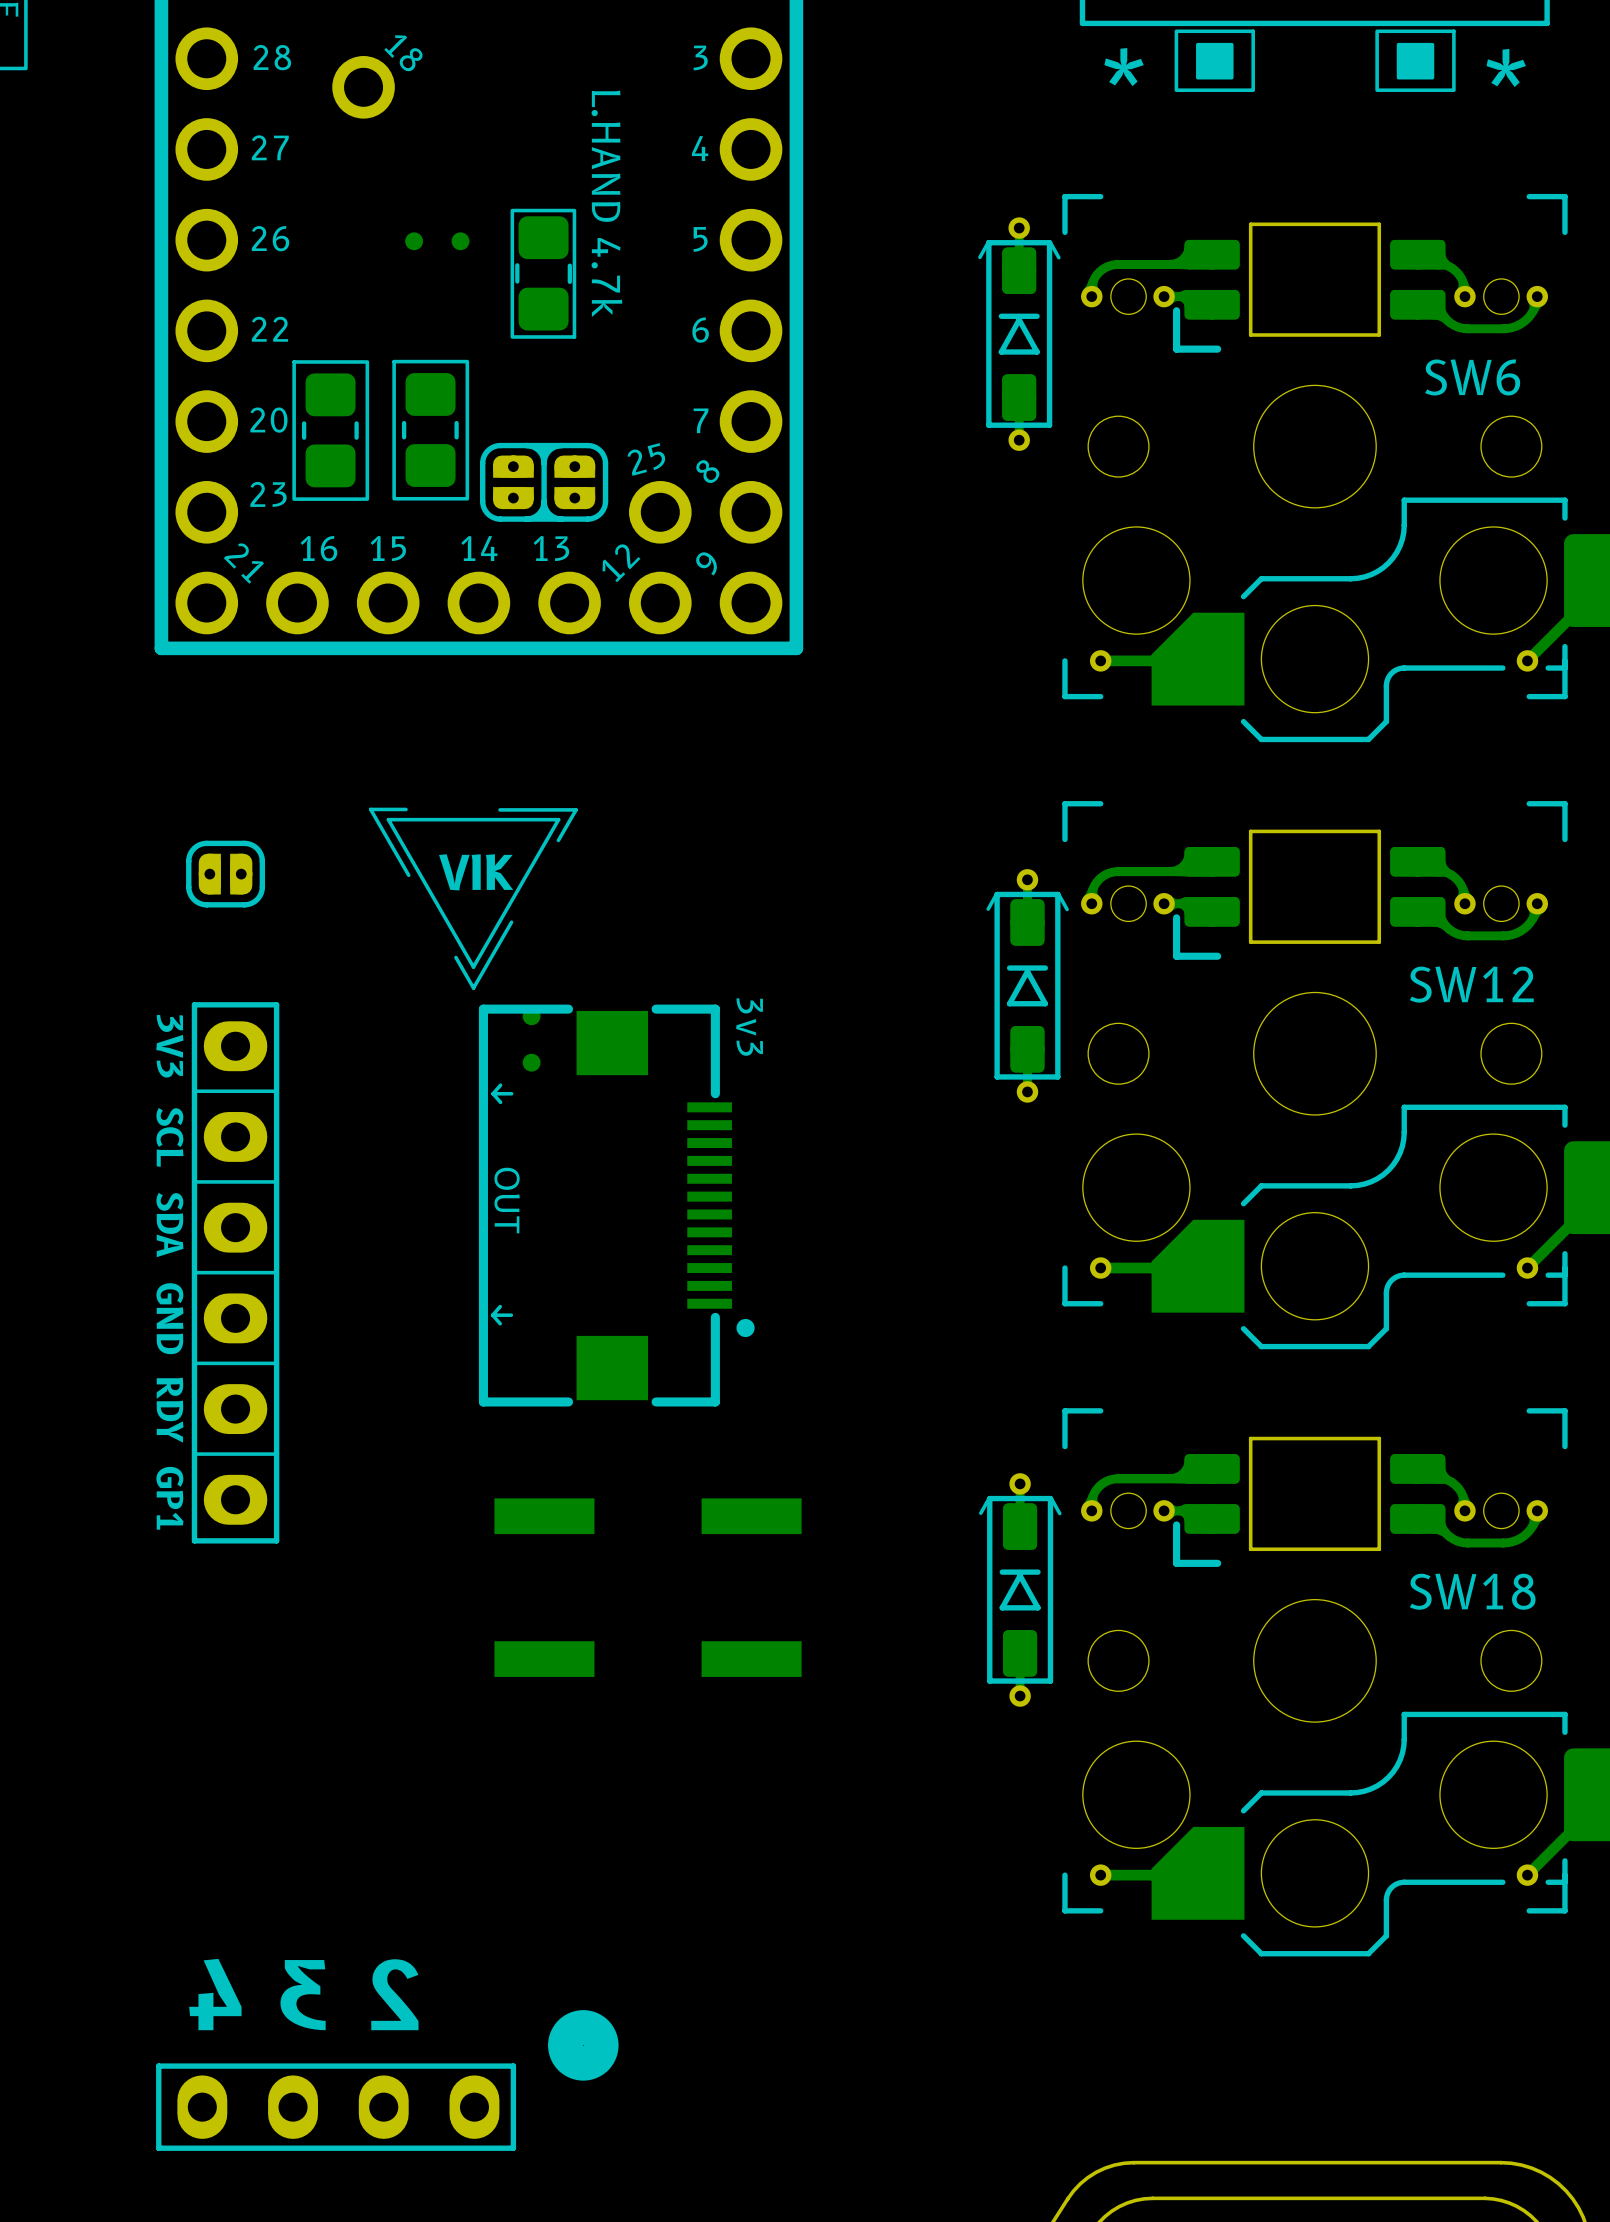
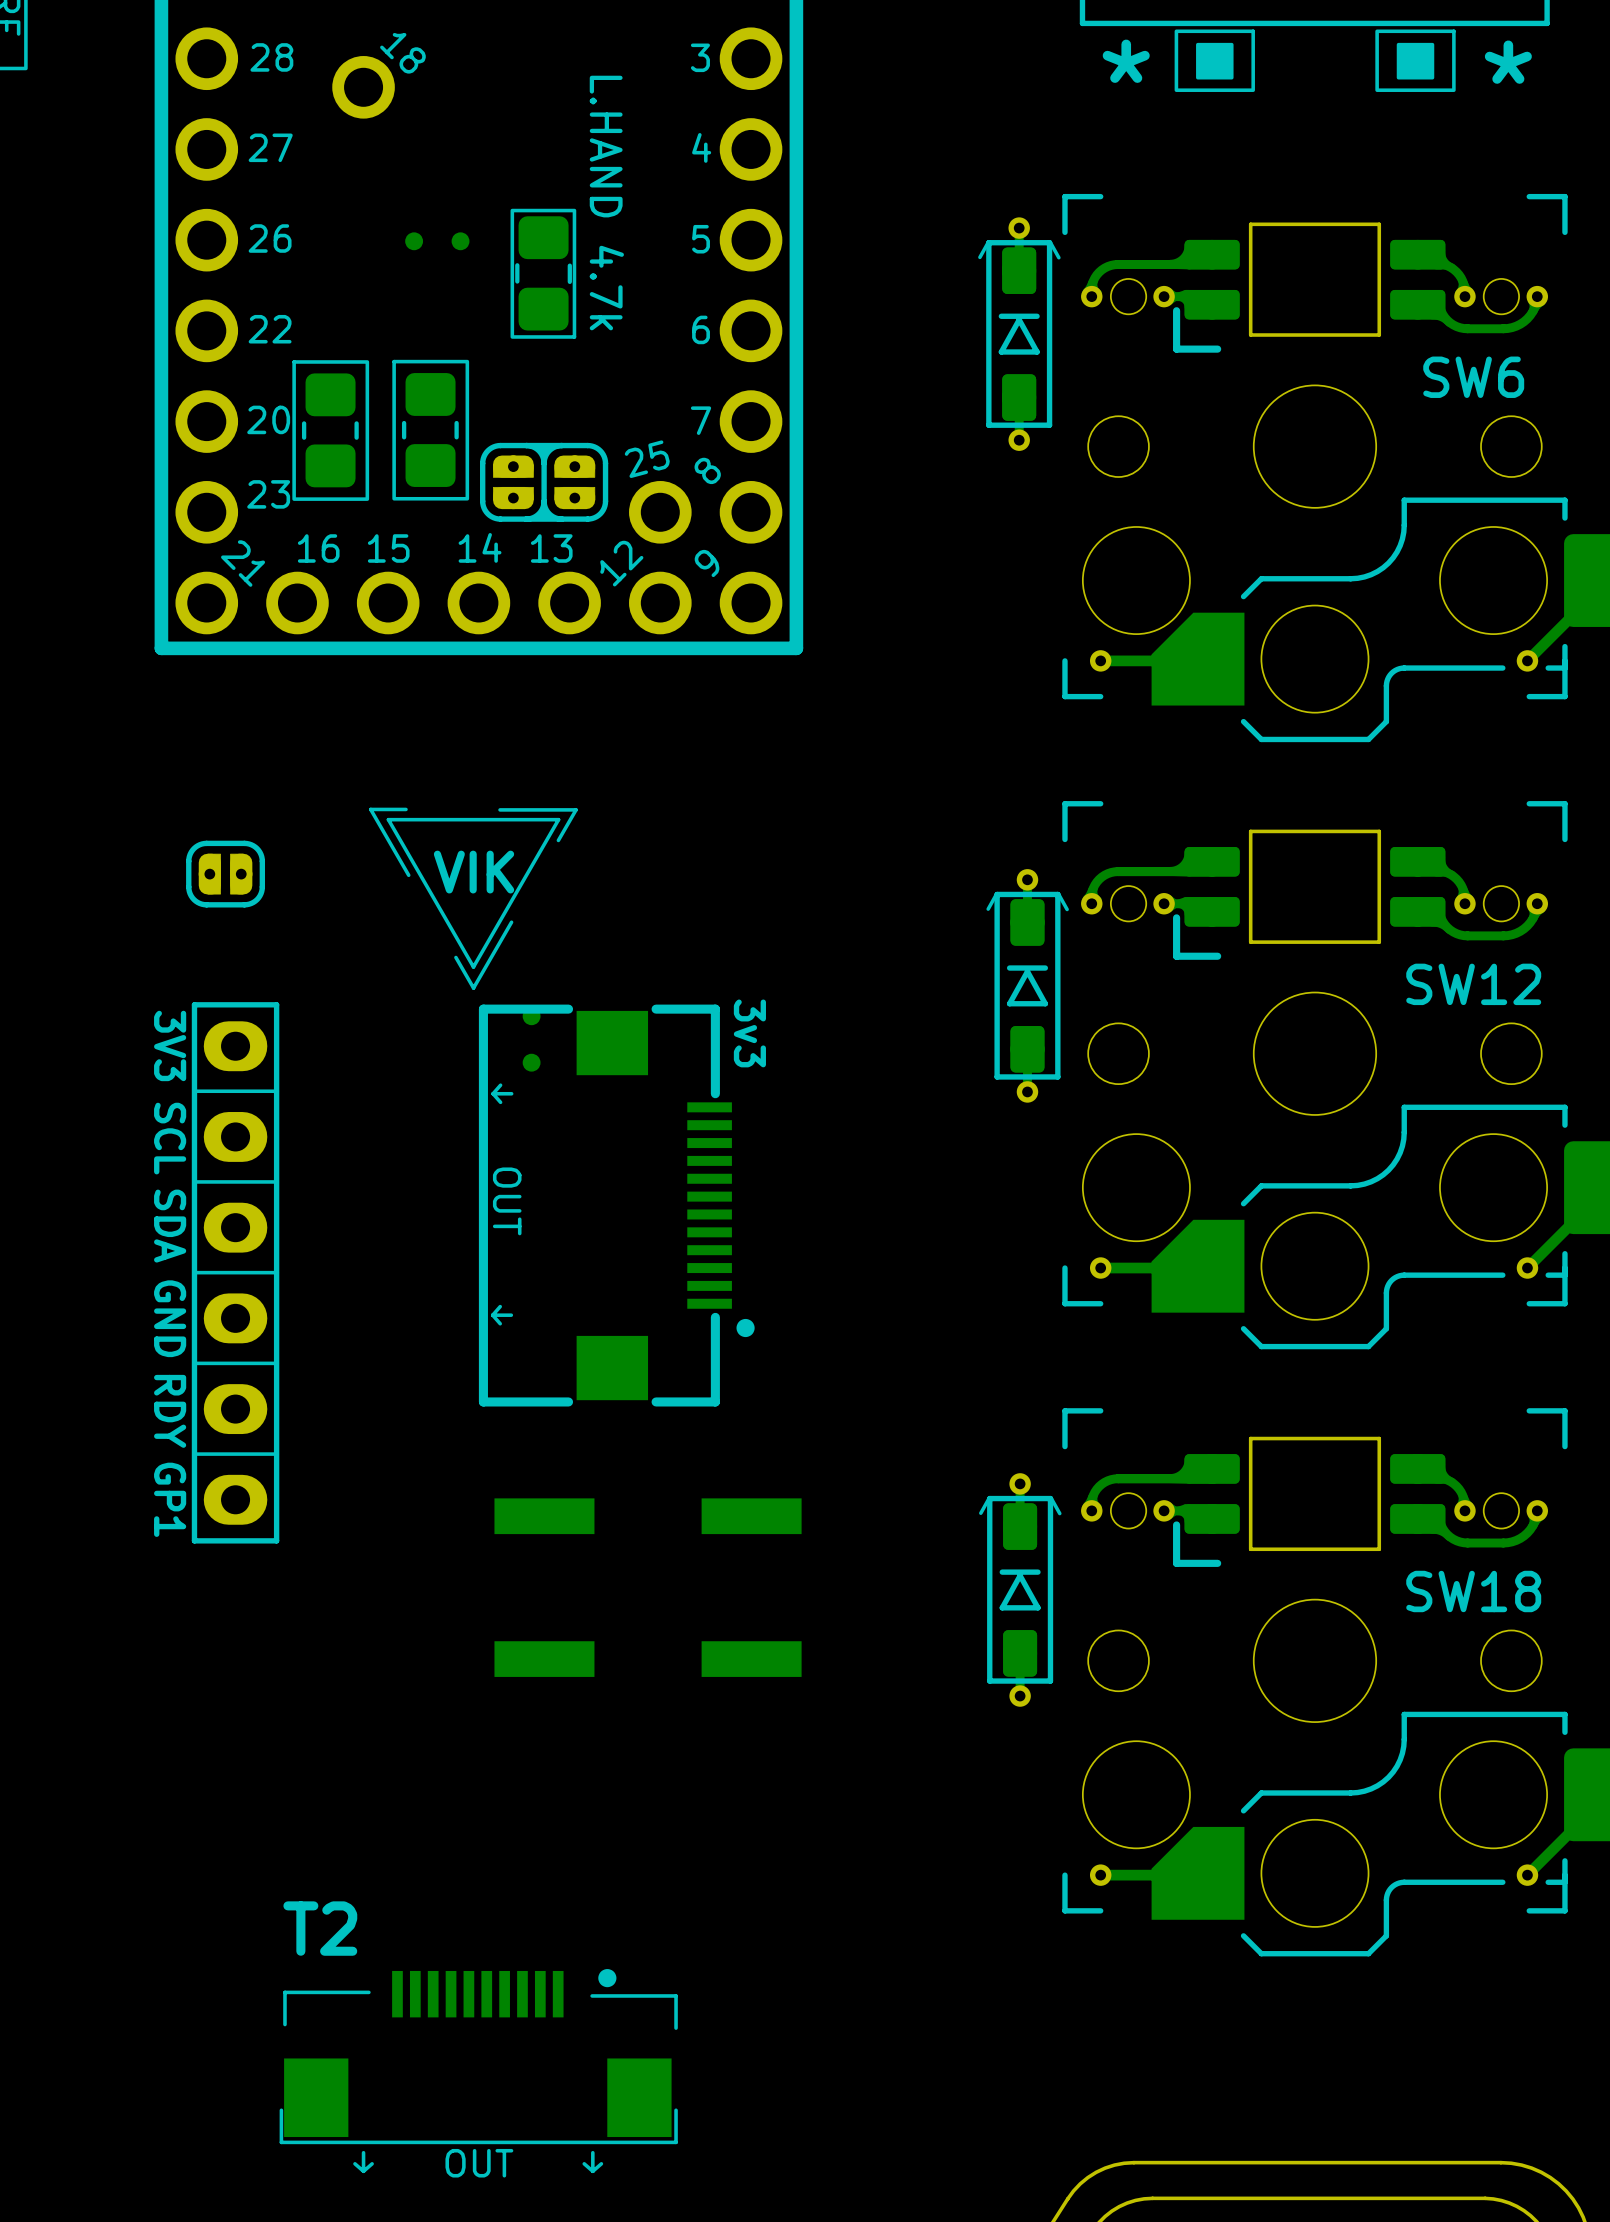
T2: none -> (478, 2071)
part: (387, 2080) -> none

